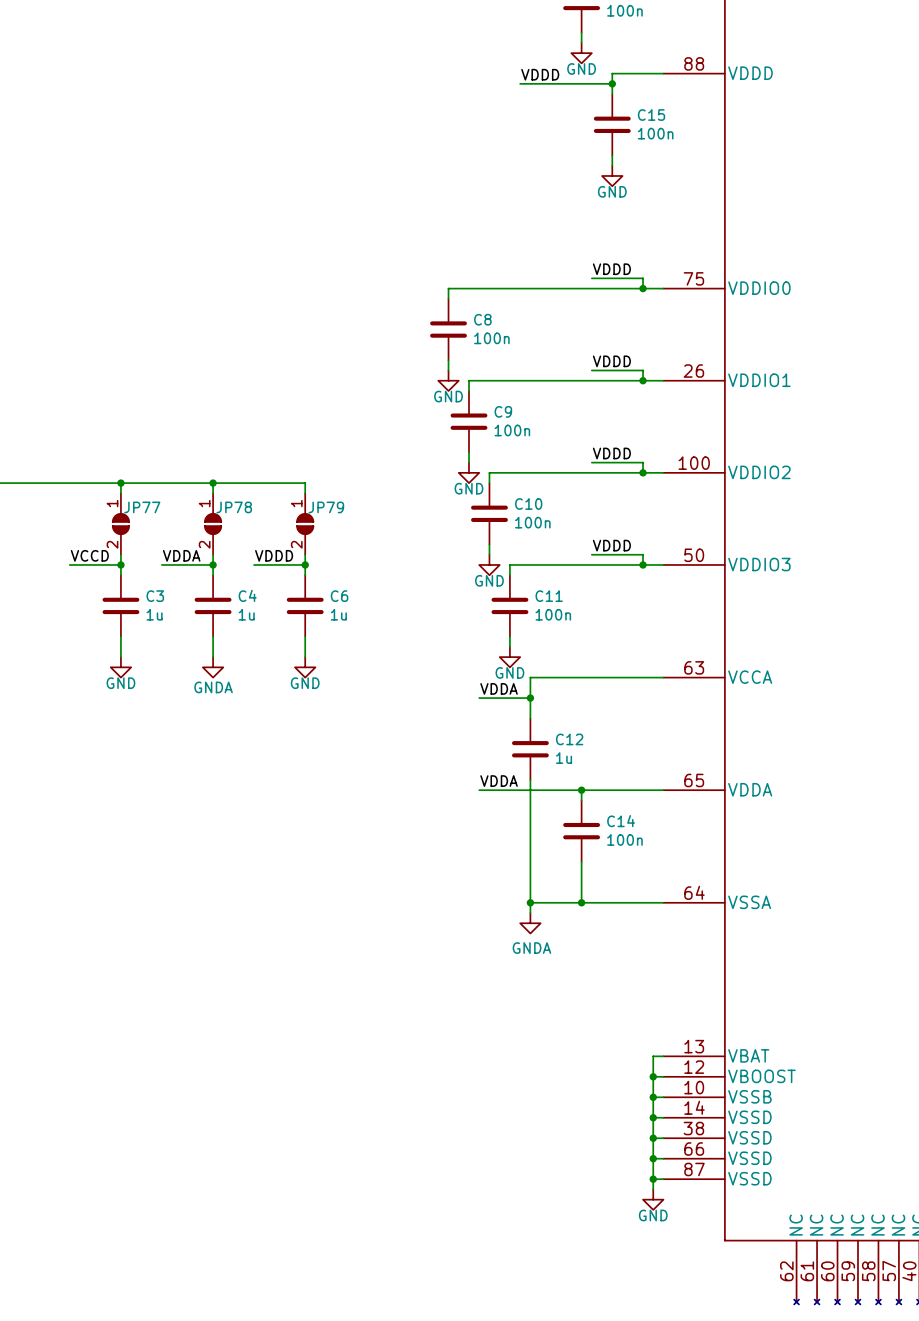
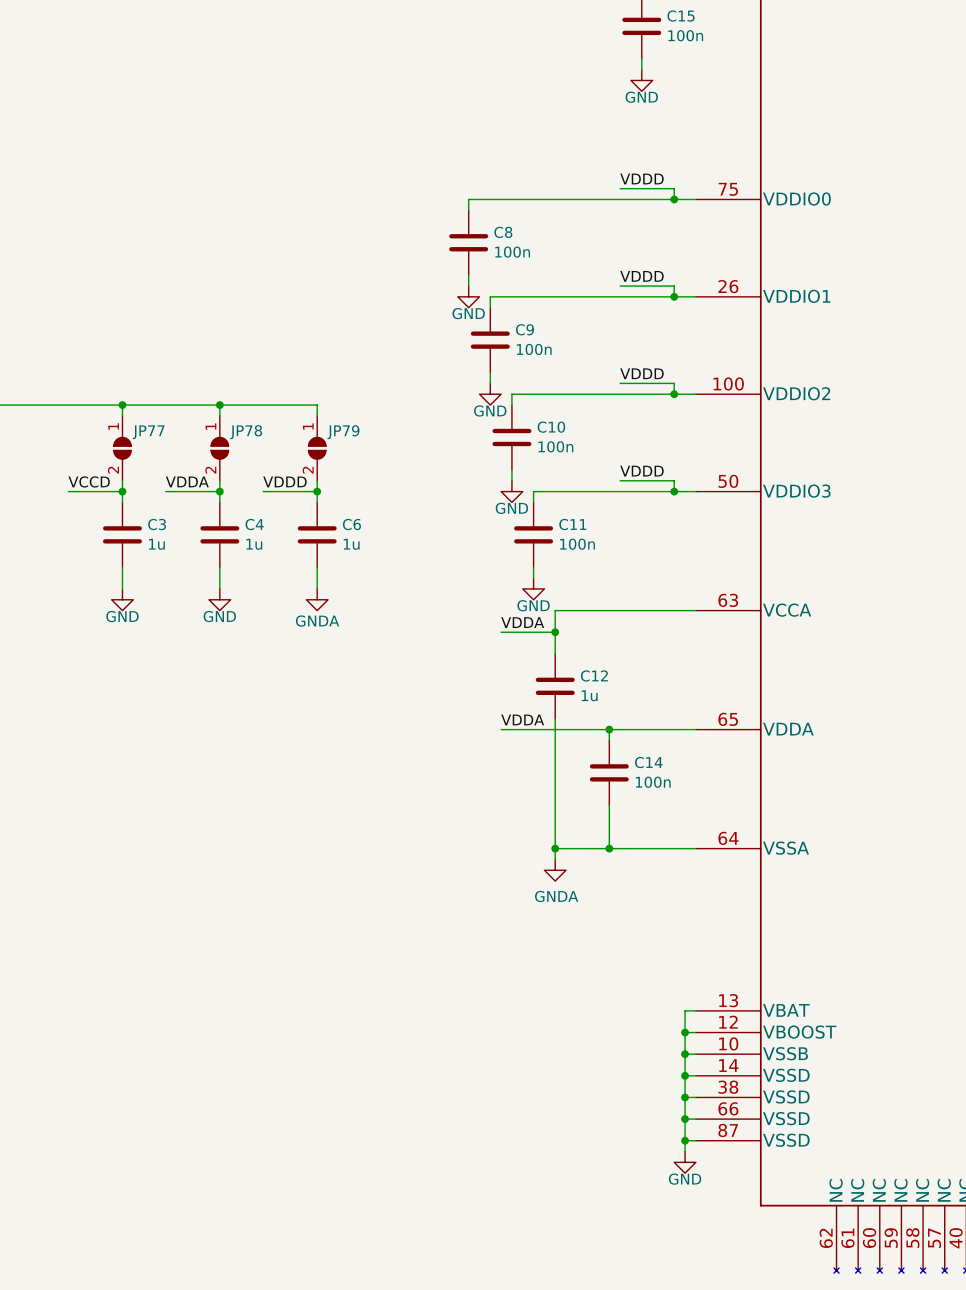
power symbol: GNDA (213, 667) -> GND (219, 599)
power symbol: GND (305, 667) -> GNDA (317, 599)

